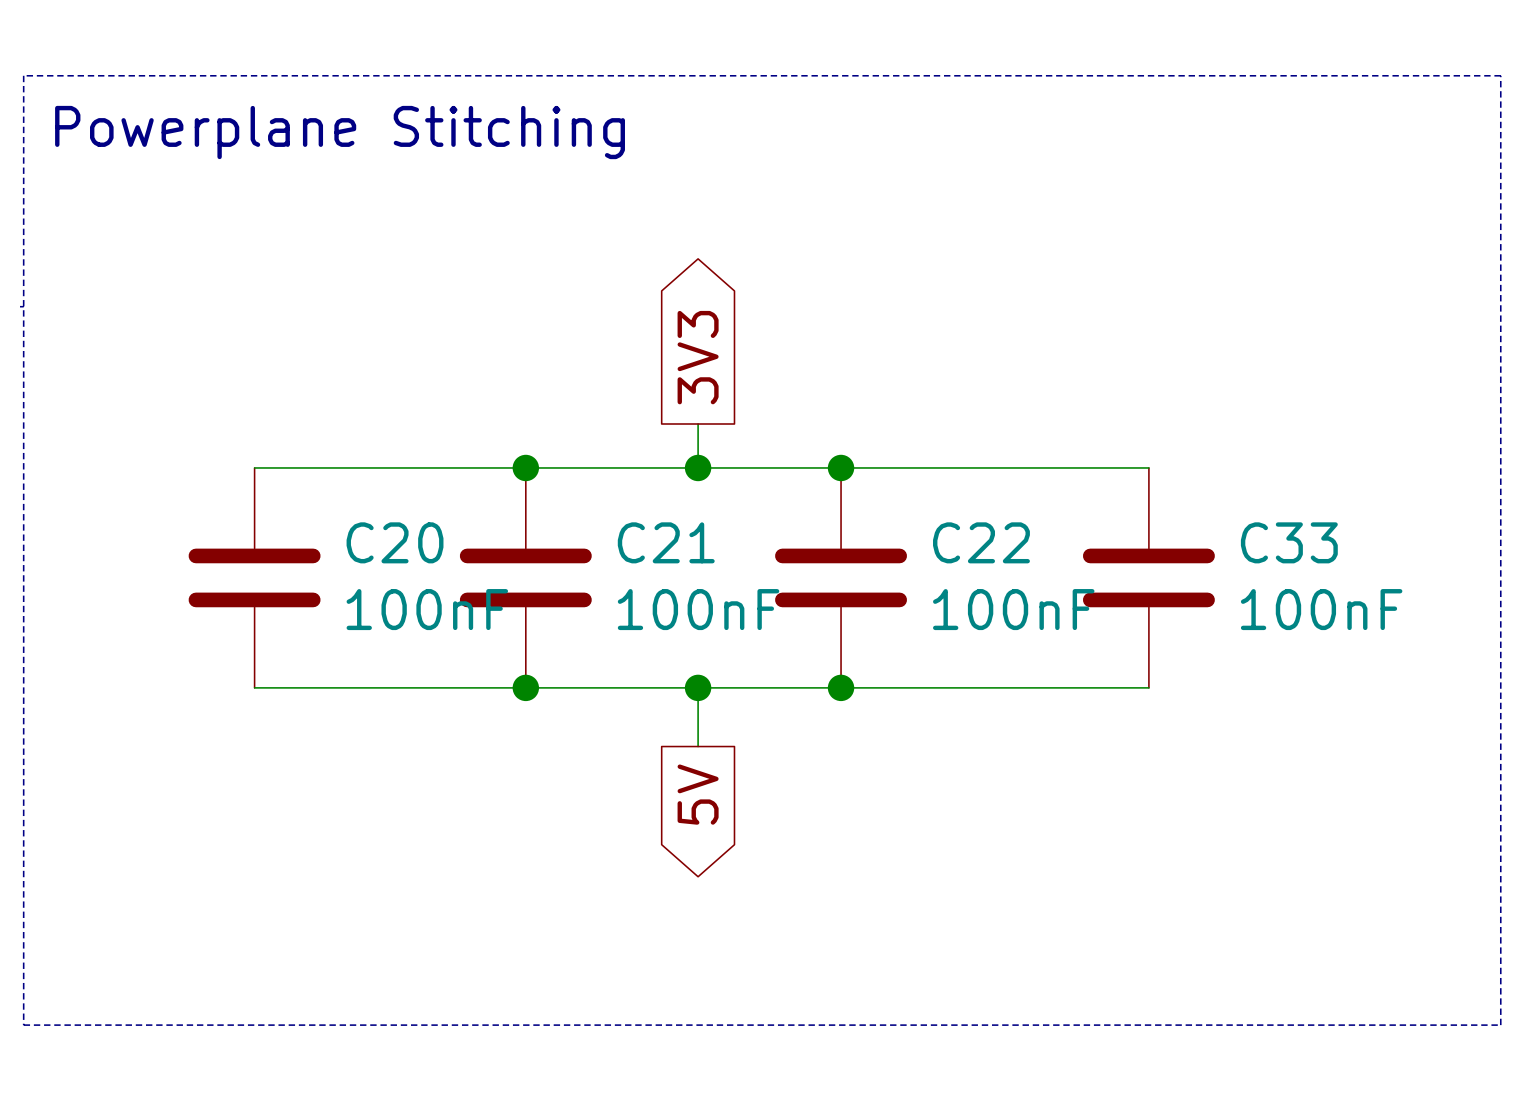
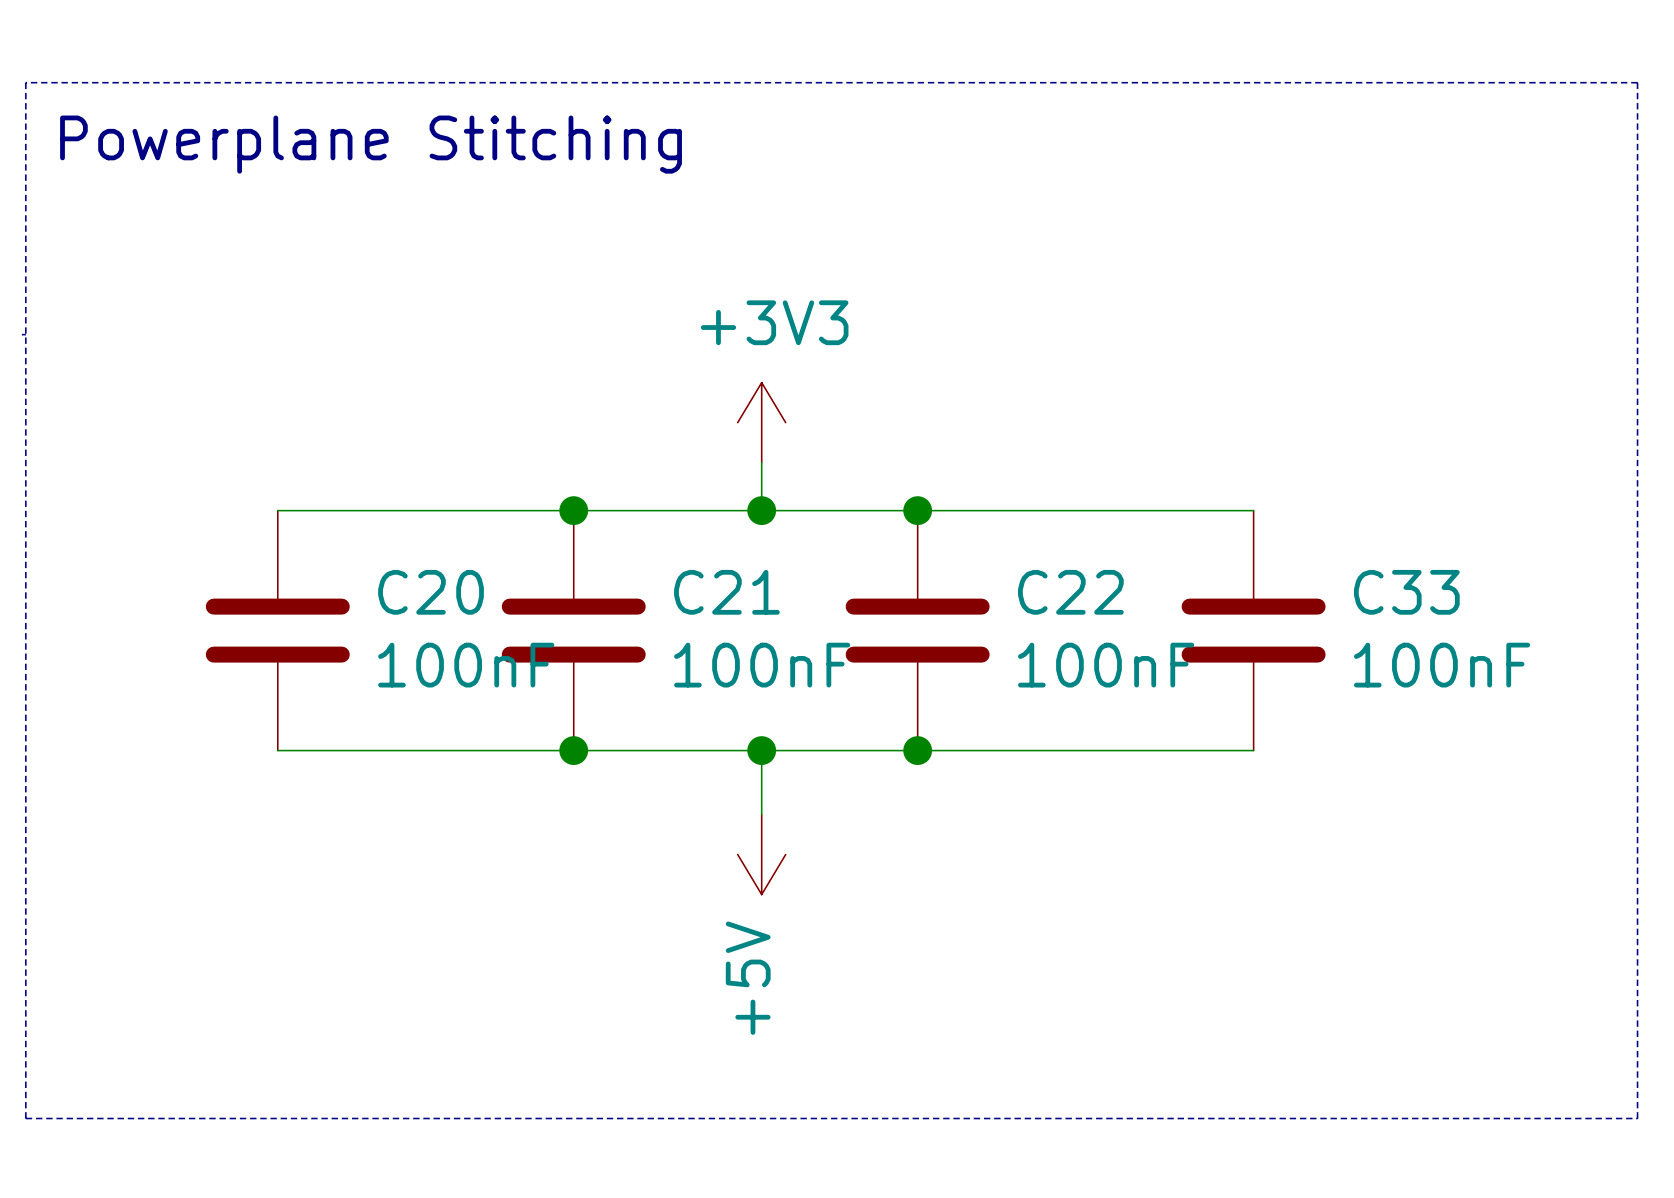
global label: 3V3 (698, 357) -> none
power symbol: none -> +3V3 (761, 422)
power symbol: none -> +5V (761, 854)
global label: 5V (698, 794) -> none

